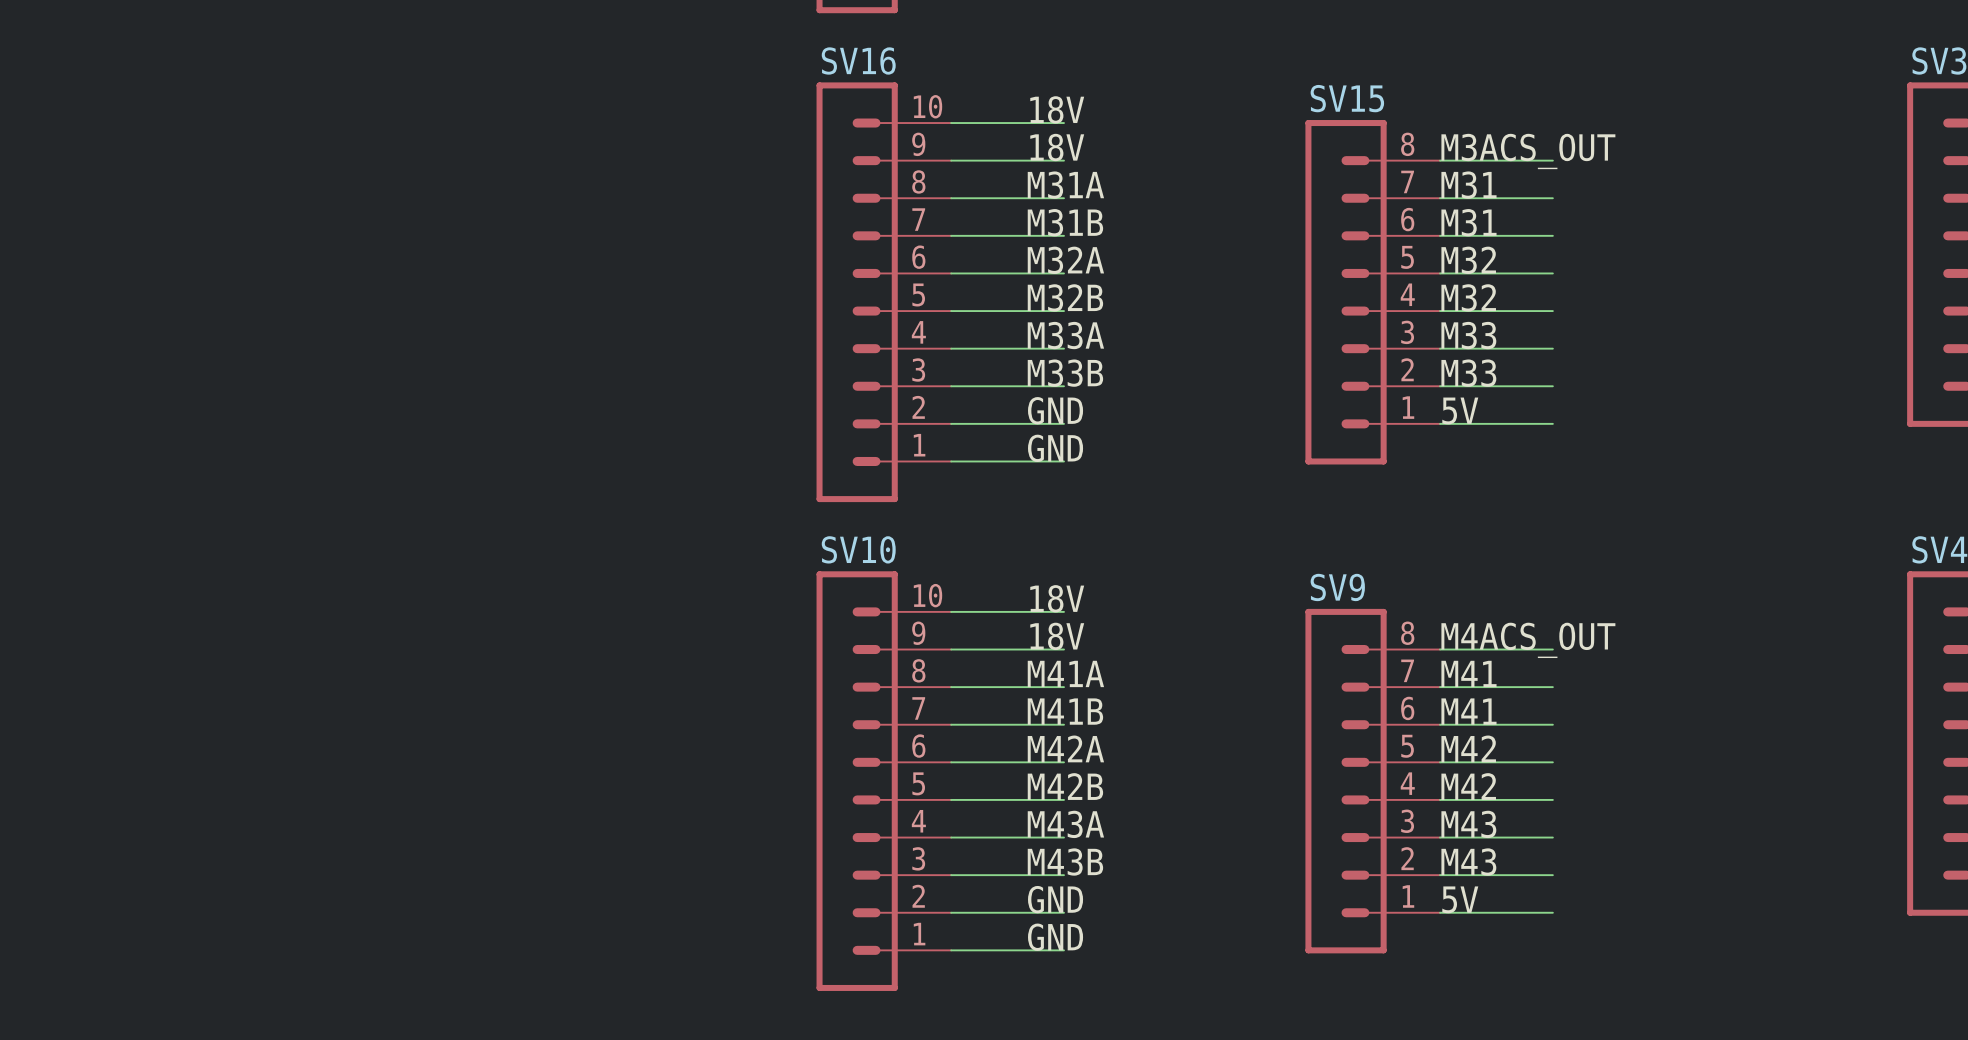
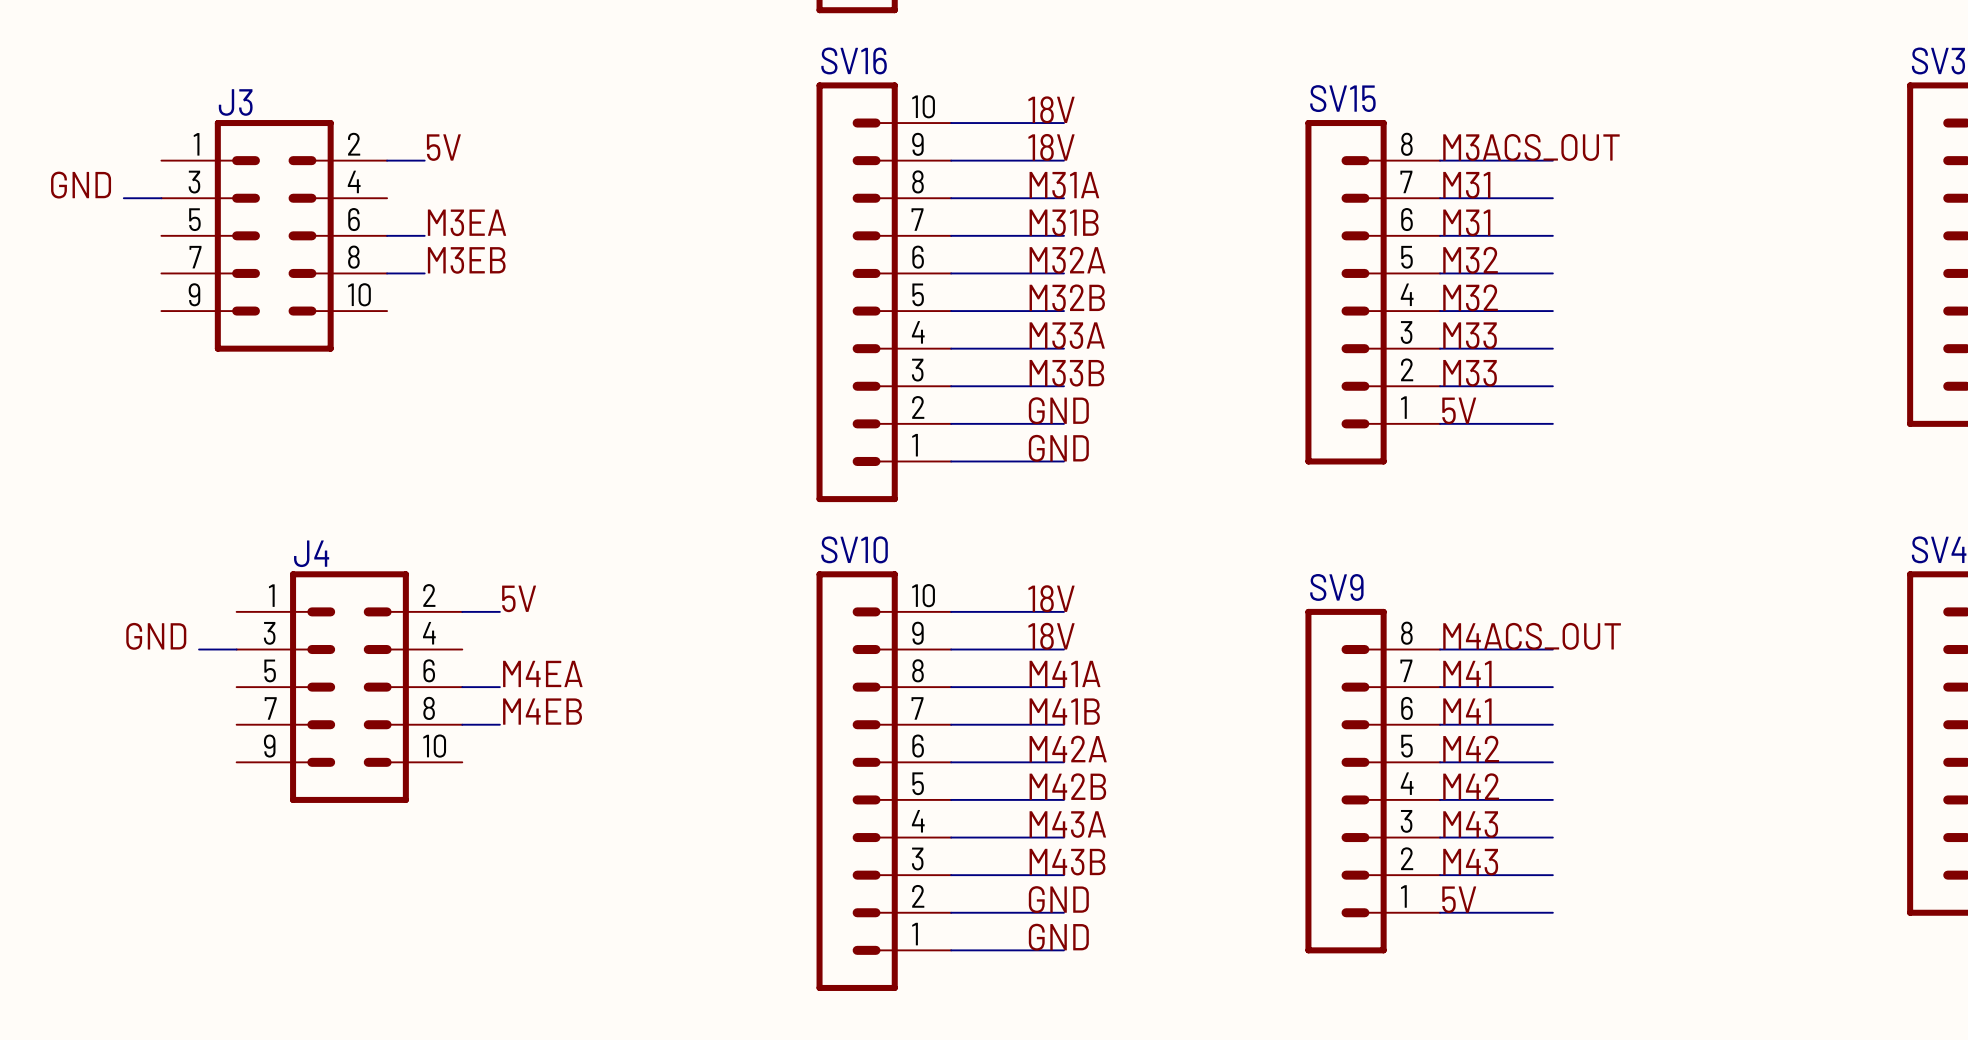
label: none -> 5V (443, 147)
wire: none -> (387, 160) (424, 160)
label: none -> GND (81, 185)
wire: none -> (123, 198) (161, 198)
label: none -> M3EA (467, 222)
J3: none -> (274, 235)
wire: none -> (387, 235) (424, 235)
label: none -> M3EB (466, 260)
wire: none -> (387, 273) (424, 273)
label: none -> 5V (519, 598)
wire: none -> (462, 611) (499, 611)
label: none -> GND (156, 636)
wire: none -> (199, 649) (236, 649)
label: none -> M4EA (542, 673)
J4: none -> (349, 687)
wire: none -> (462, 687) (499, 687)
label: none -> M4EB (542, 711)
wire: none -> (462, 724) (499, 724)

